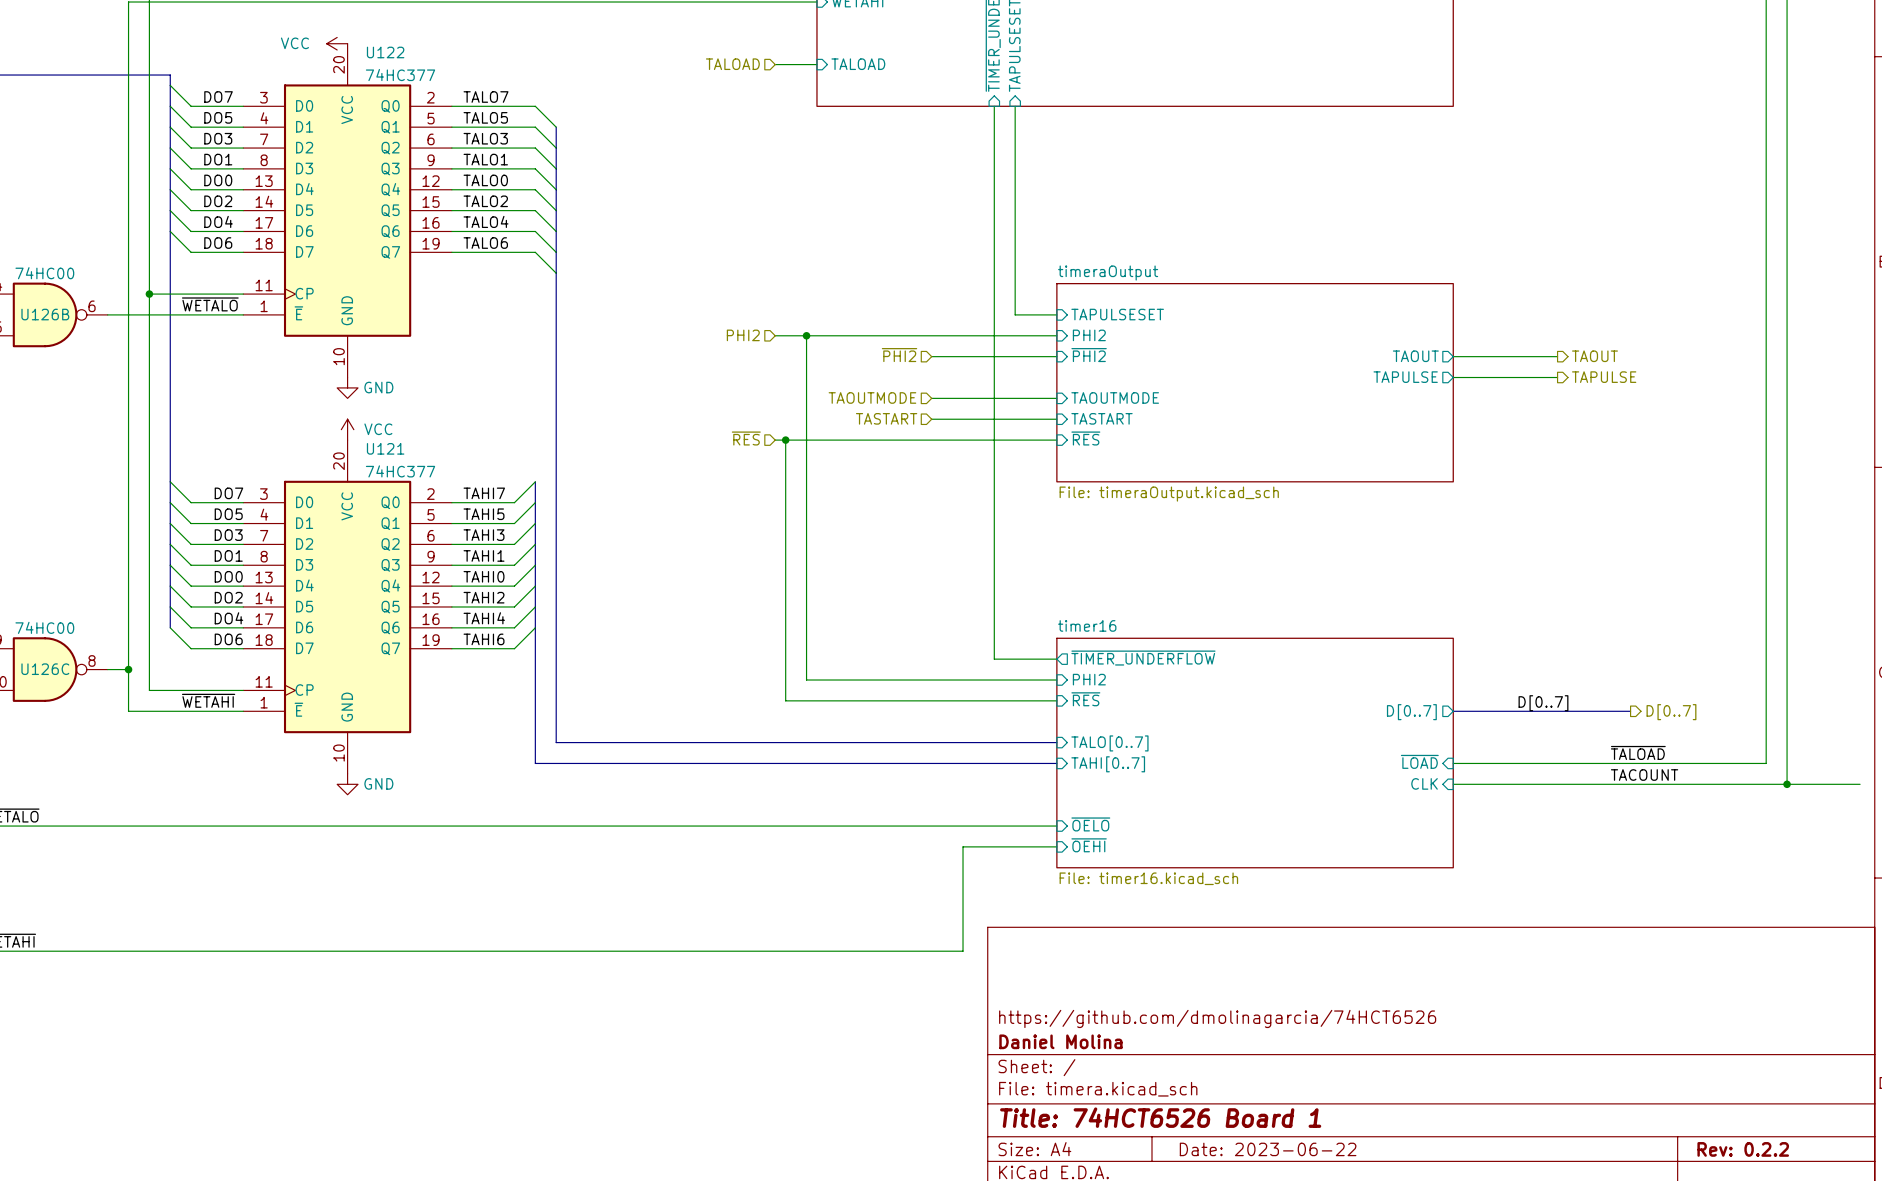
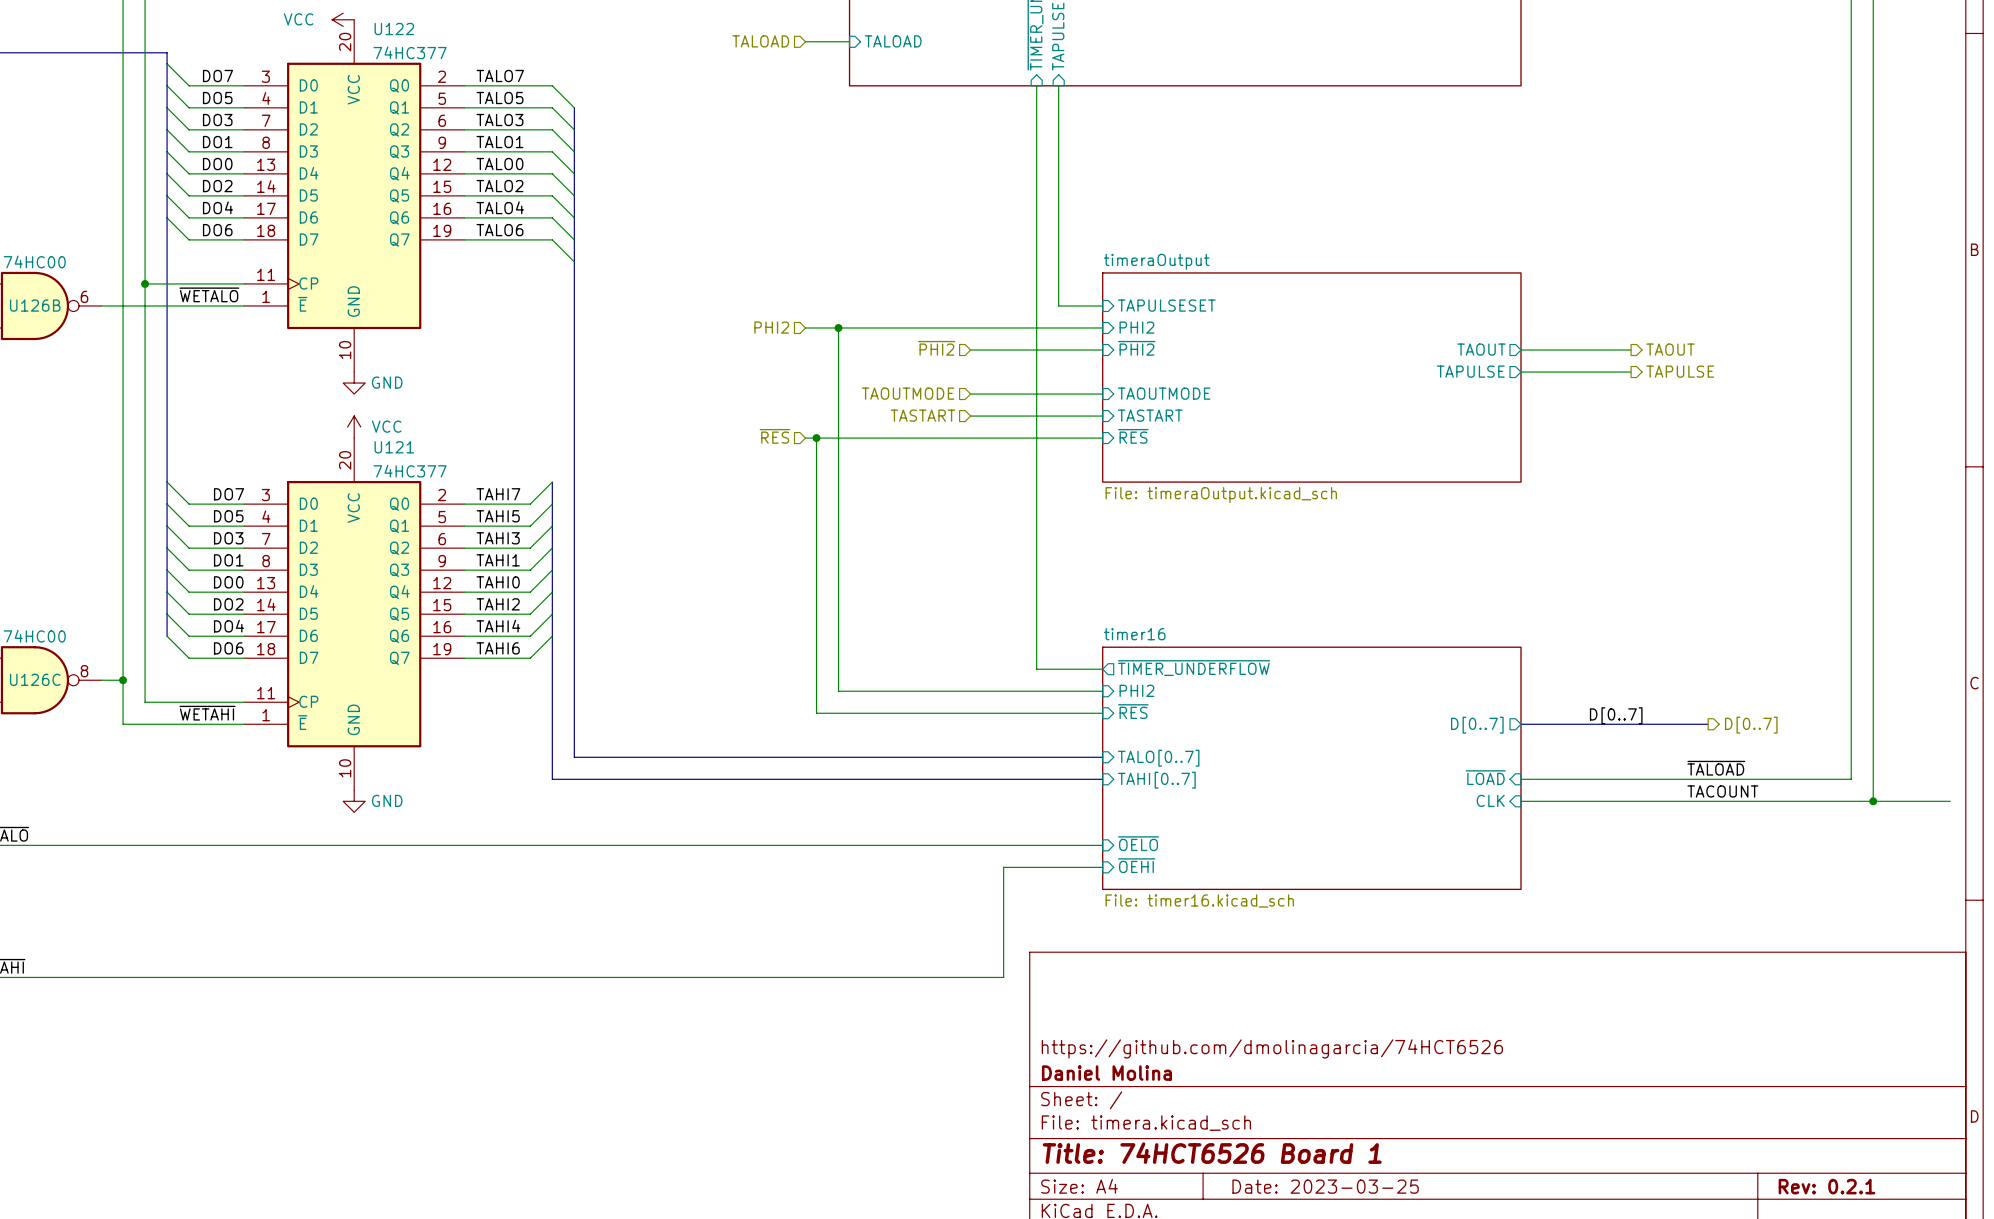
title block: Date: 2023-06-22 (1268, 1149) -> Date: 2023-03-25 (1325, 1186)
title block: Rev: 0.2.2 (1743, 1149) -> Rev: 0.2.1 (1826, 1186)

